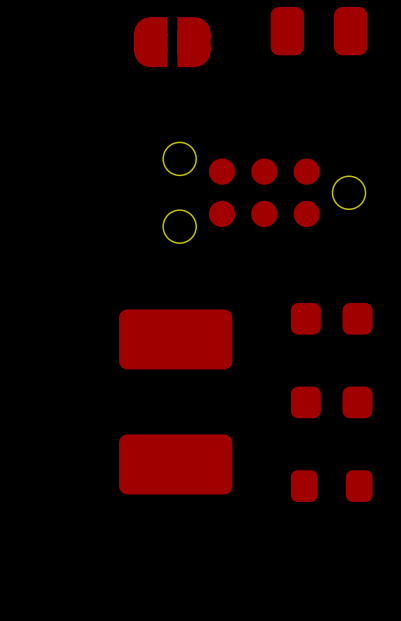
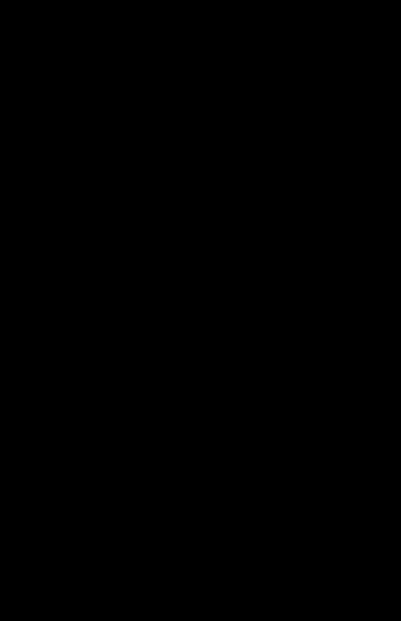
part: (319, 31) -> none
part: (172, 42) -> none
part: (264, 192) -> none
part: (331, 318) -> none
part: (175, 339) -> none
part: (331, 402) -> none
part: (175, 464) -> none
part: (331, 486) -> none

